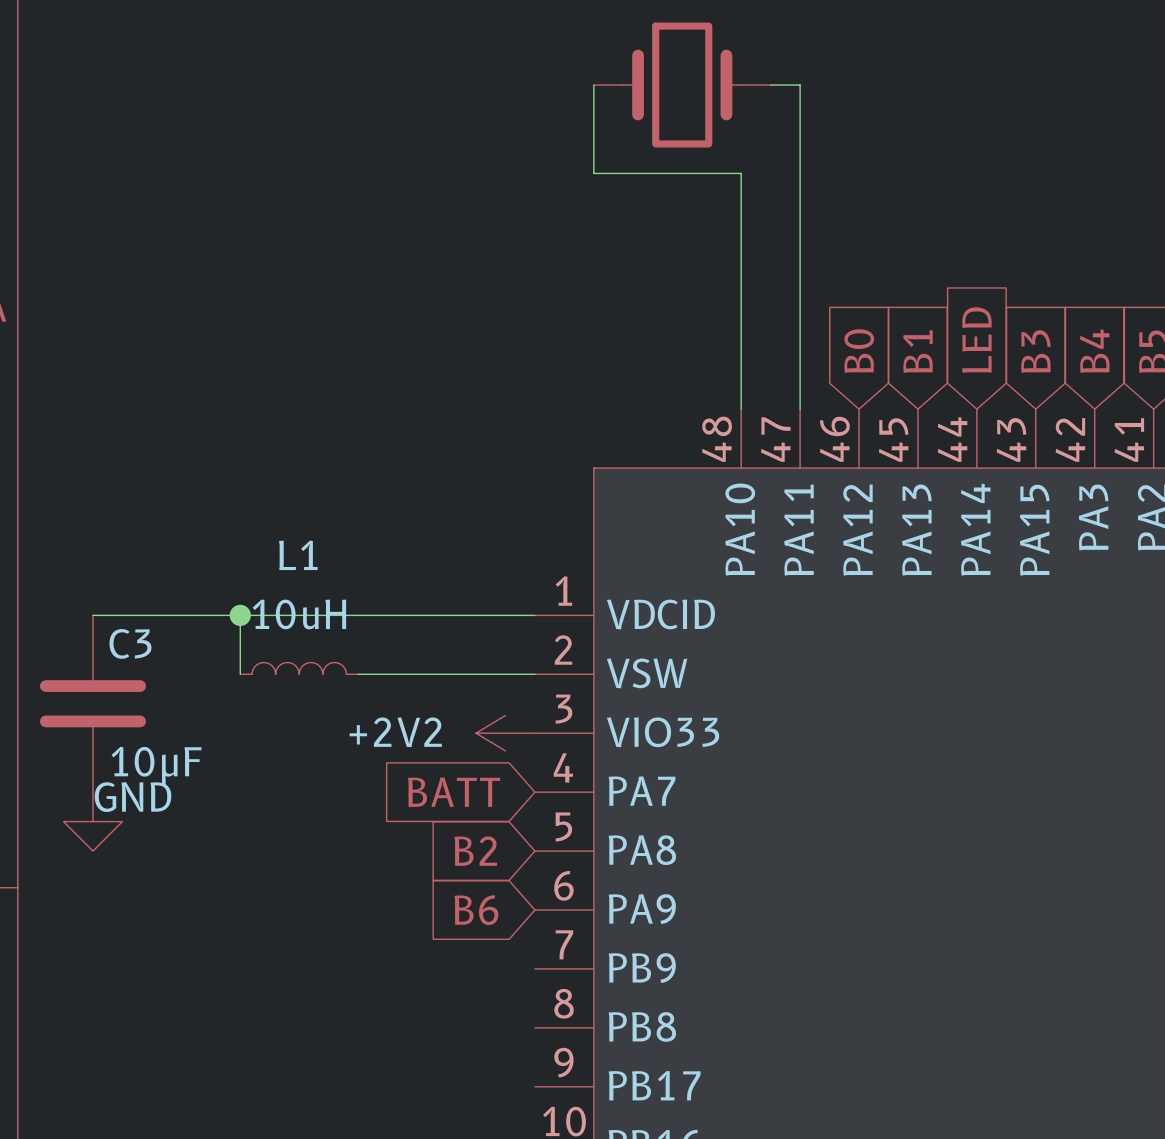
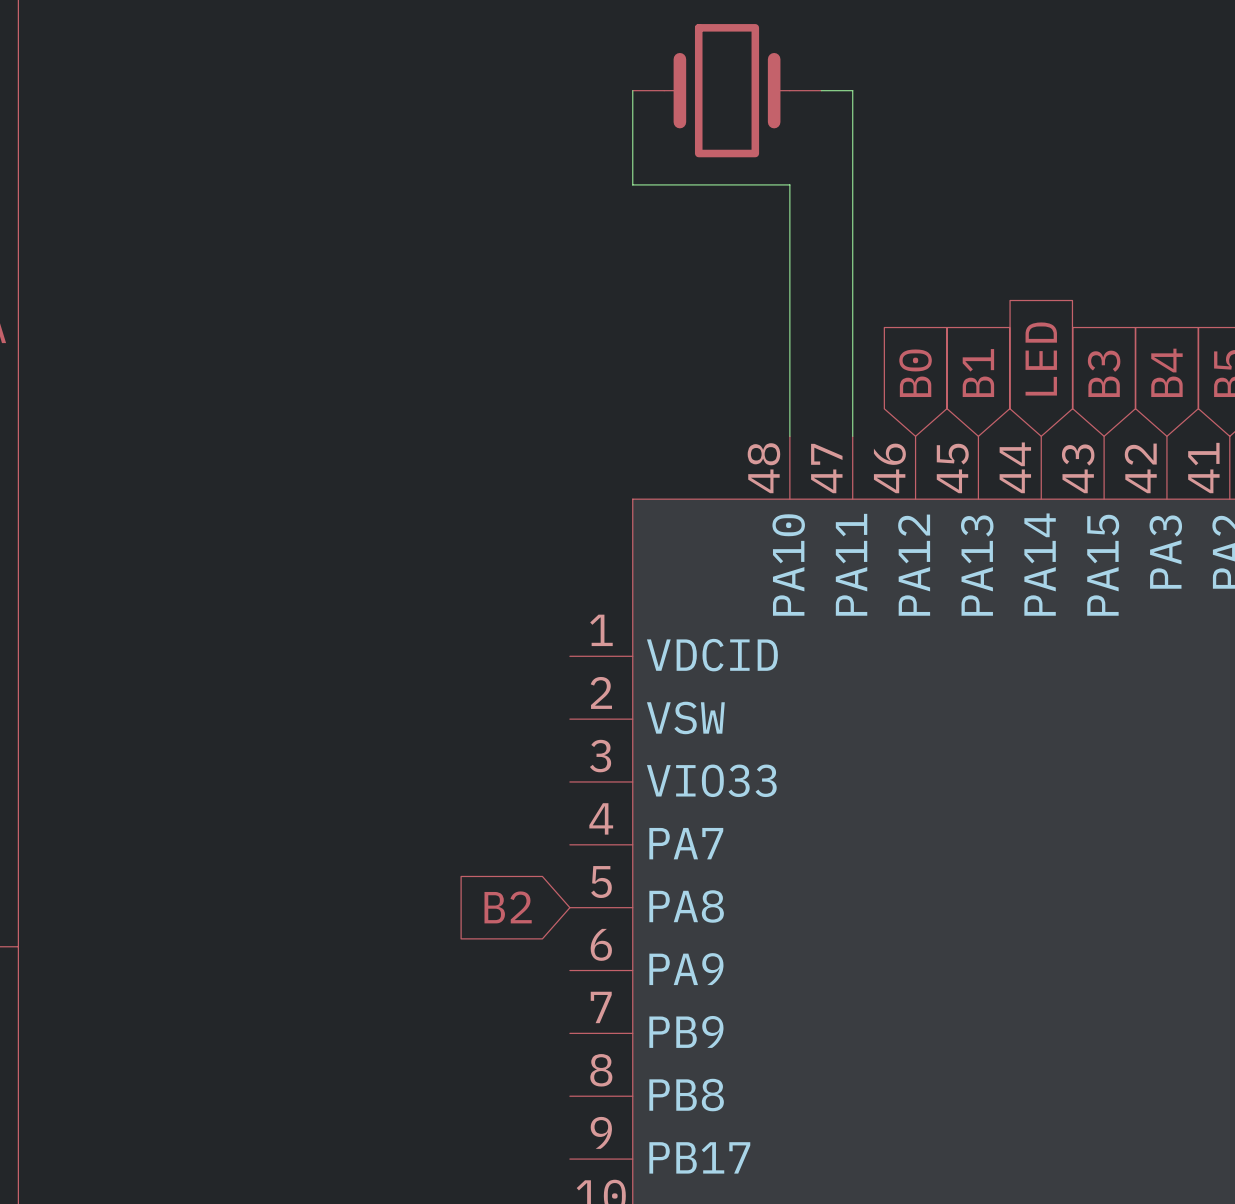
wire: (92, 615) (534, 615) -> none
wire: (240, 615) (240, 674) -> none
junction: (240, 615) -> none
L1: 10uH (299, 668) -> none
wire: (358, 674) (534, 674) -> none
C3: 10μF (92, 703) -> none
power symbol: +2V2 (505, 733) -> none
global label: BATT (454, 792) -> none
power symbol: GND (92, 821) -> none
global label: B6 (476, 910) -> none

